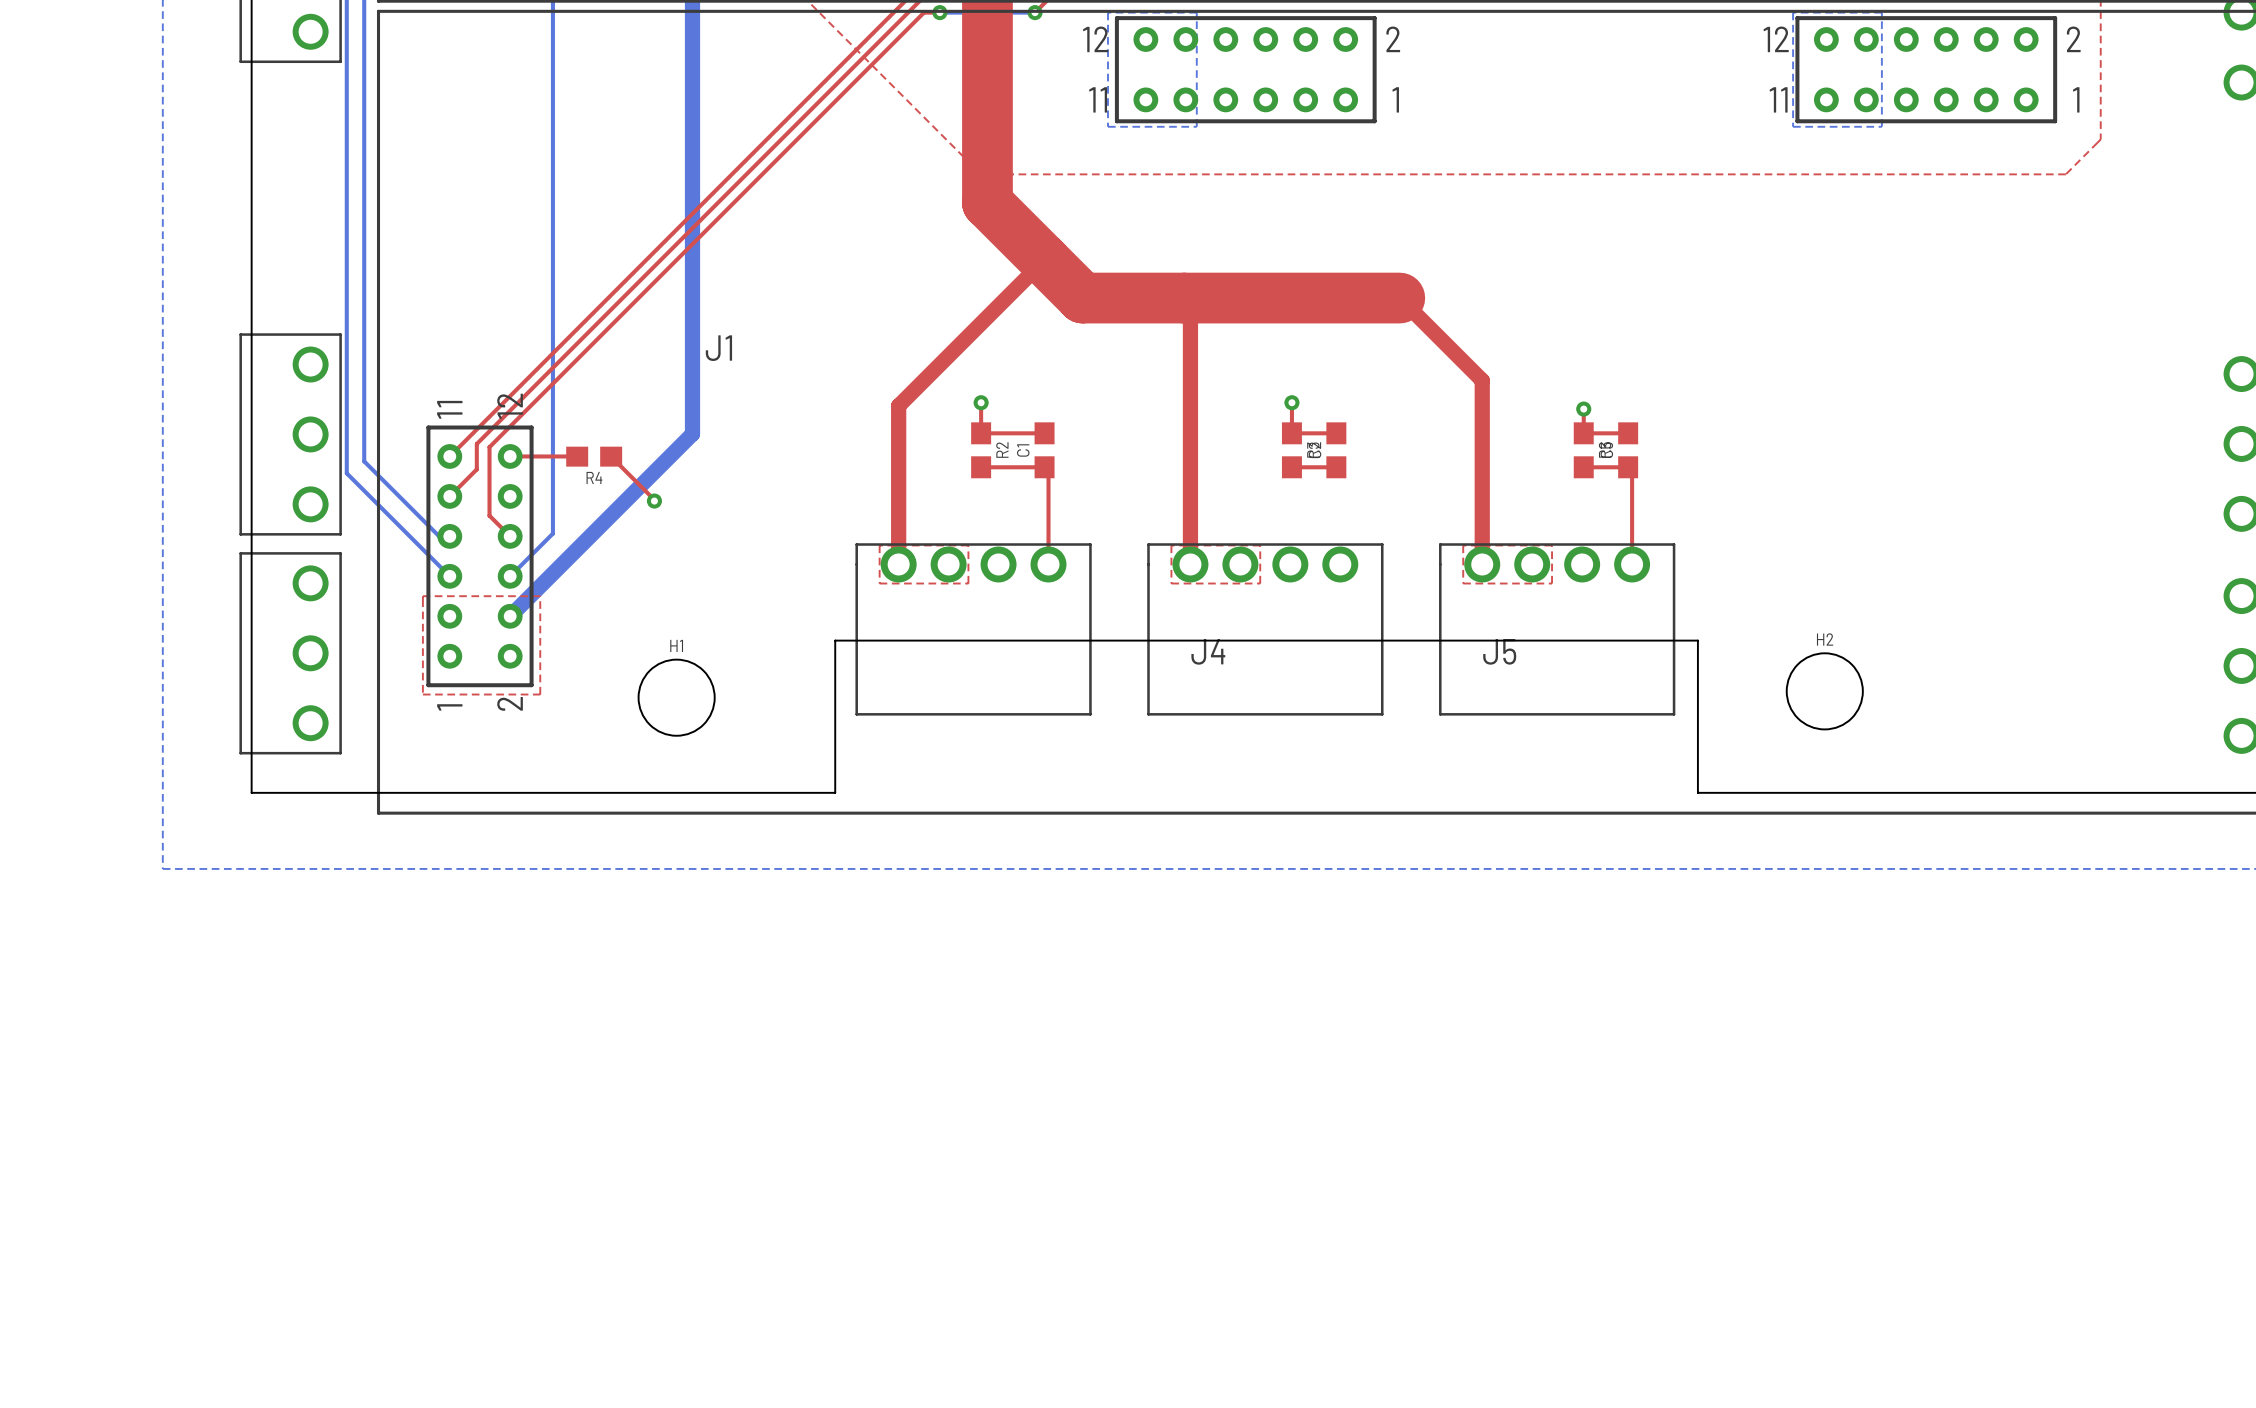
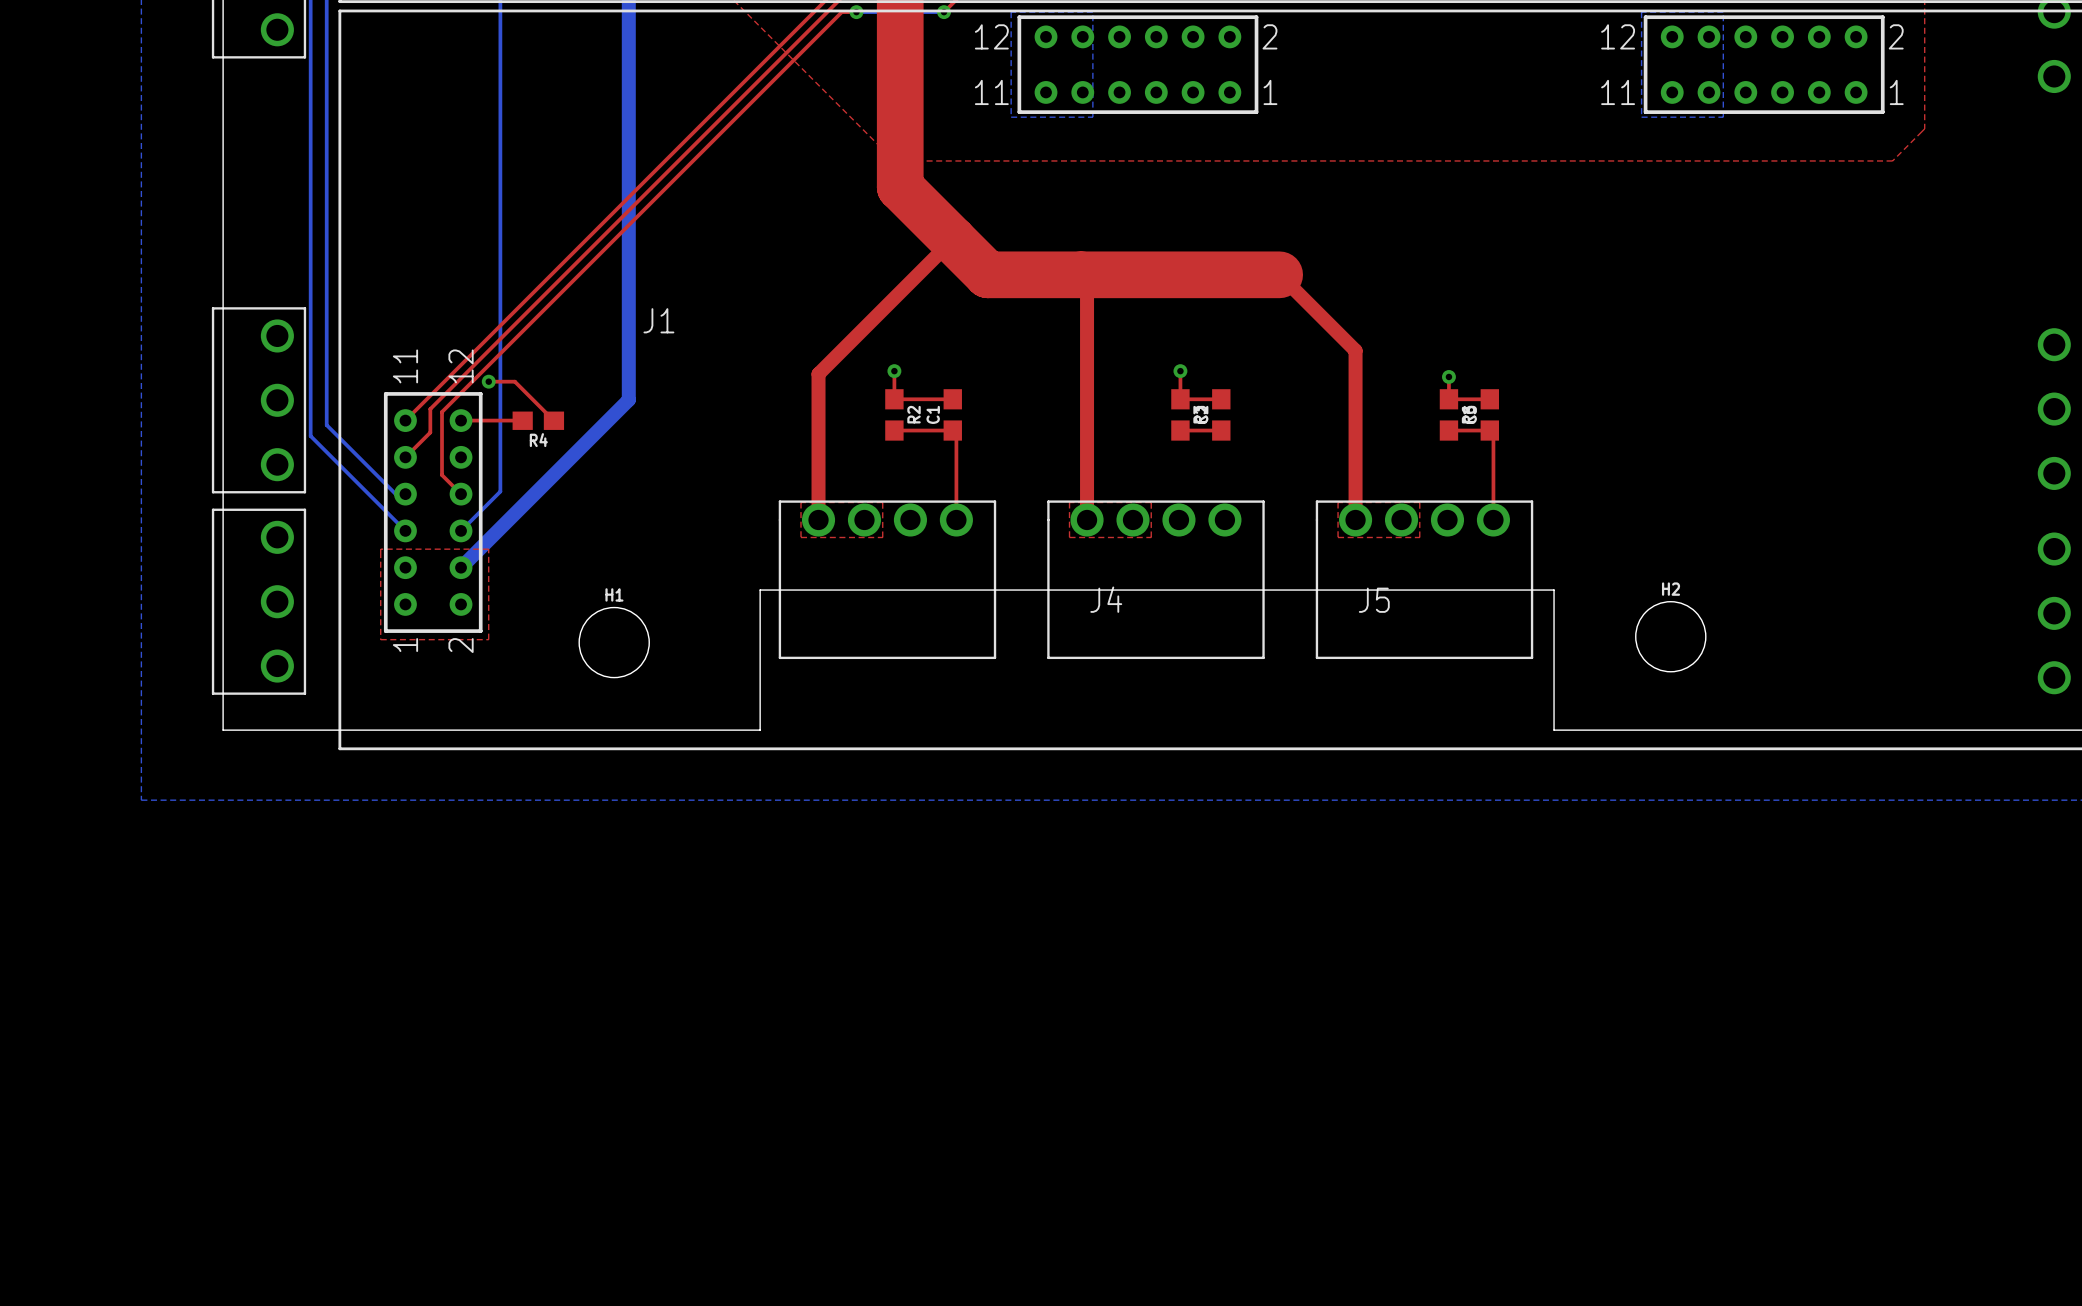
via: none -> (488, 381)
top track: (611, 456) (654, 501) -> (553, 420) (514, 381) (488, 381)
via: (654, 501) -> none

